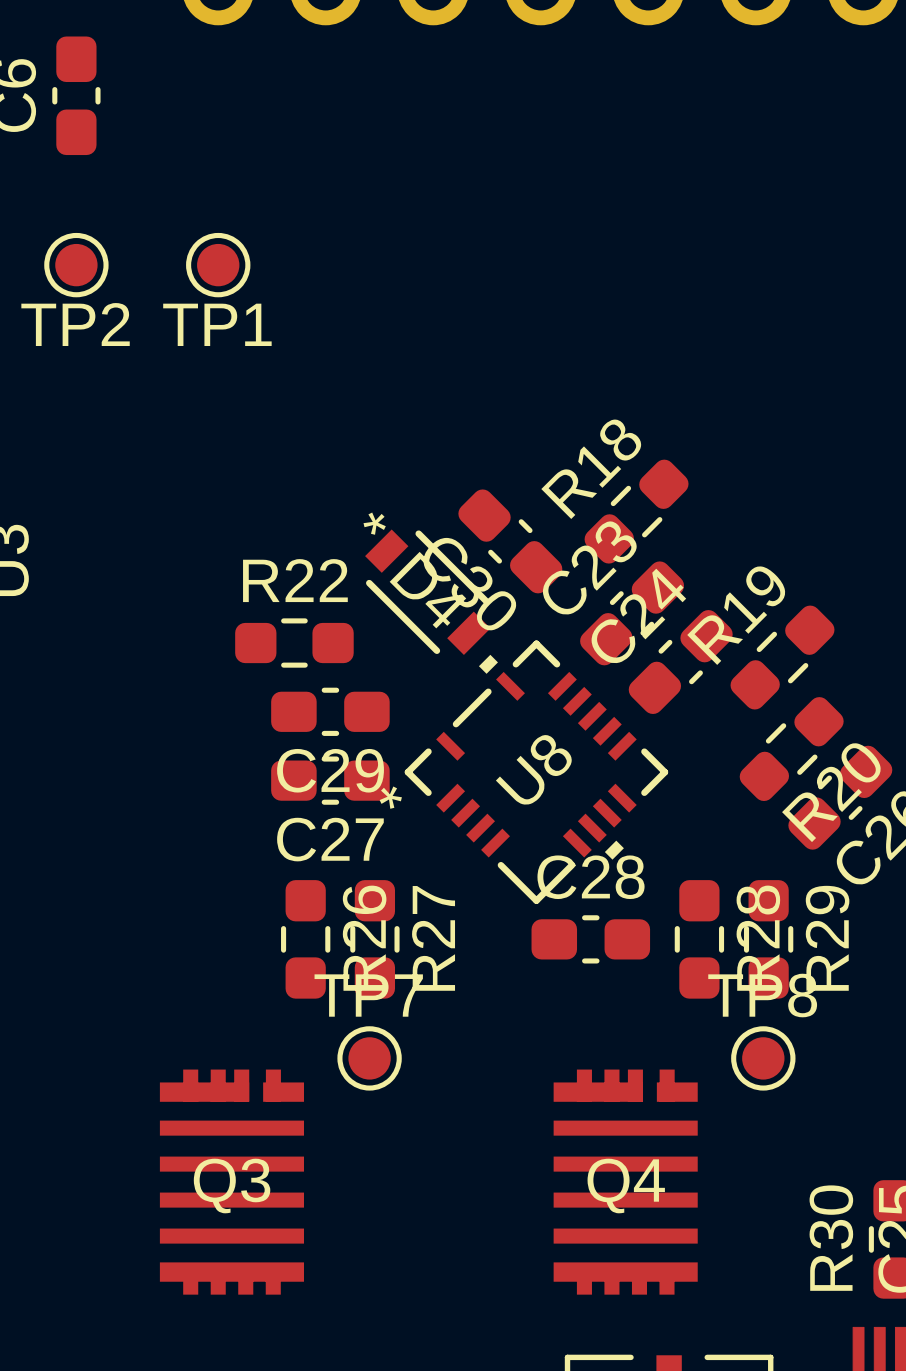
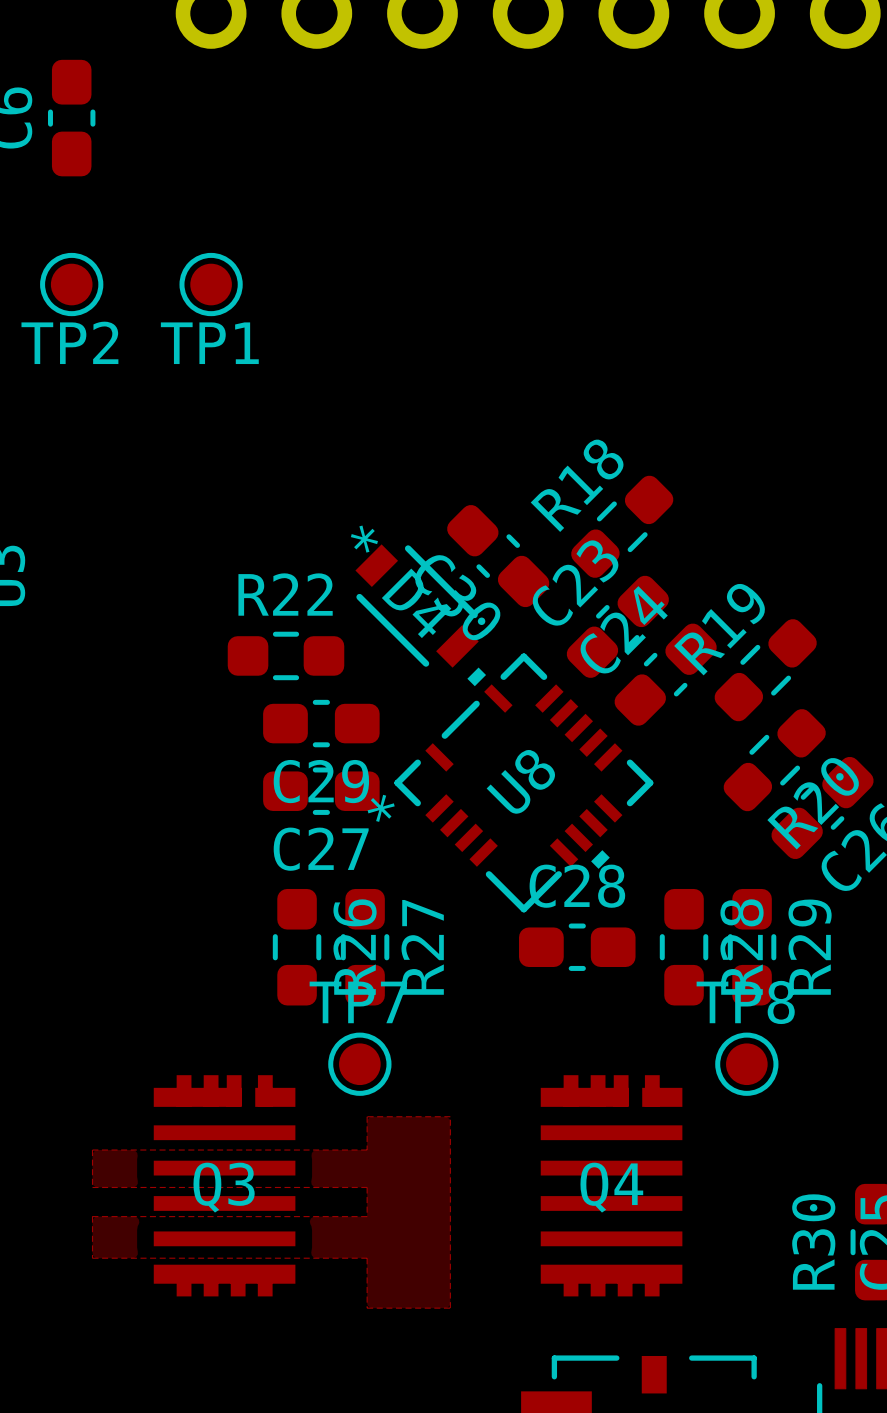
zone outline: none -> (367, 1116) (367, 1150) (92, 1150) (92, 1187) (367, 1187) (367, 1216) (92, 1216) (92, 1258) (367, 1258) (367, 1308) (450, 1308) (450, 1116) (367, 1116)

